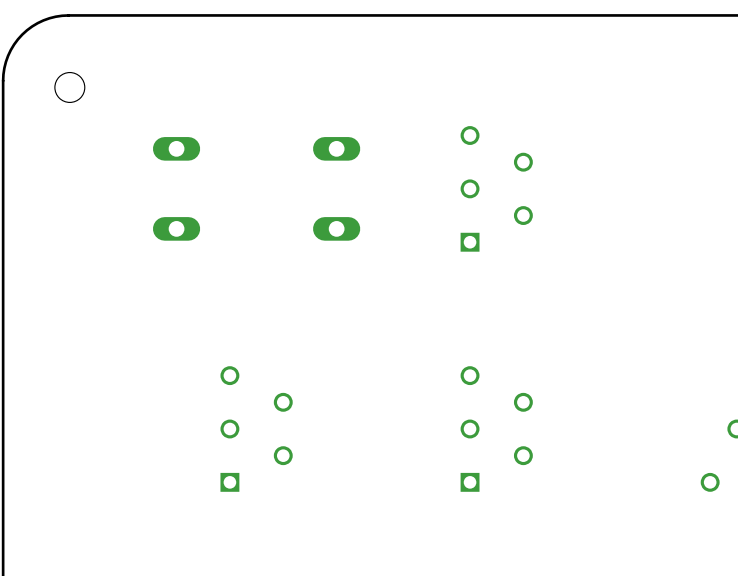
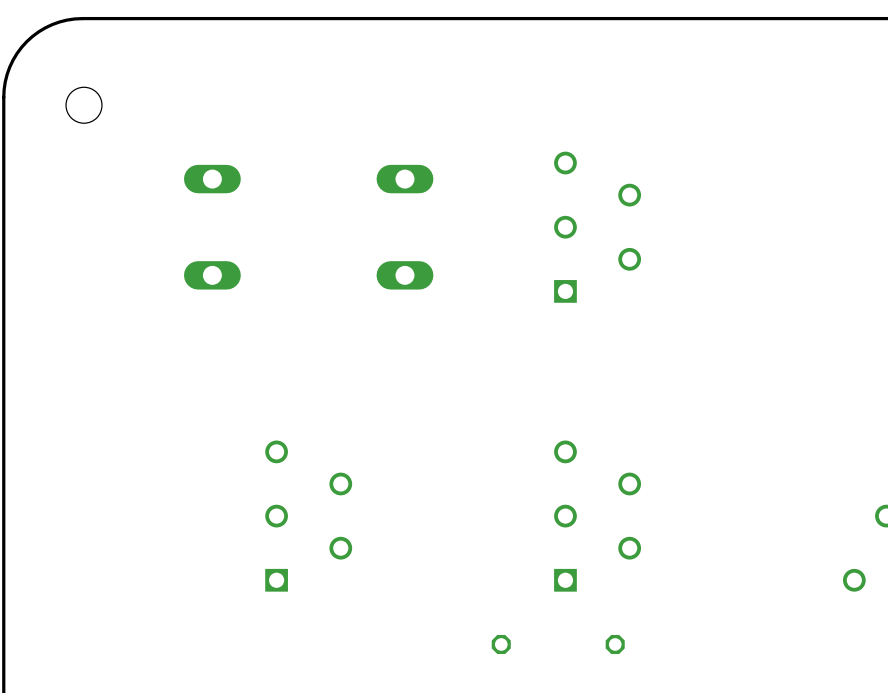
part: none -> (501, 644)
part: none -> (615, 644)

